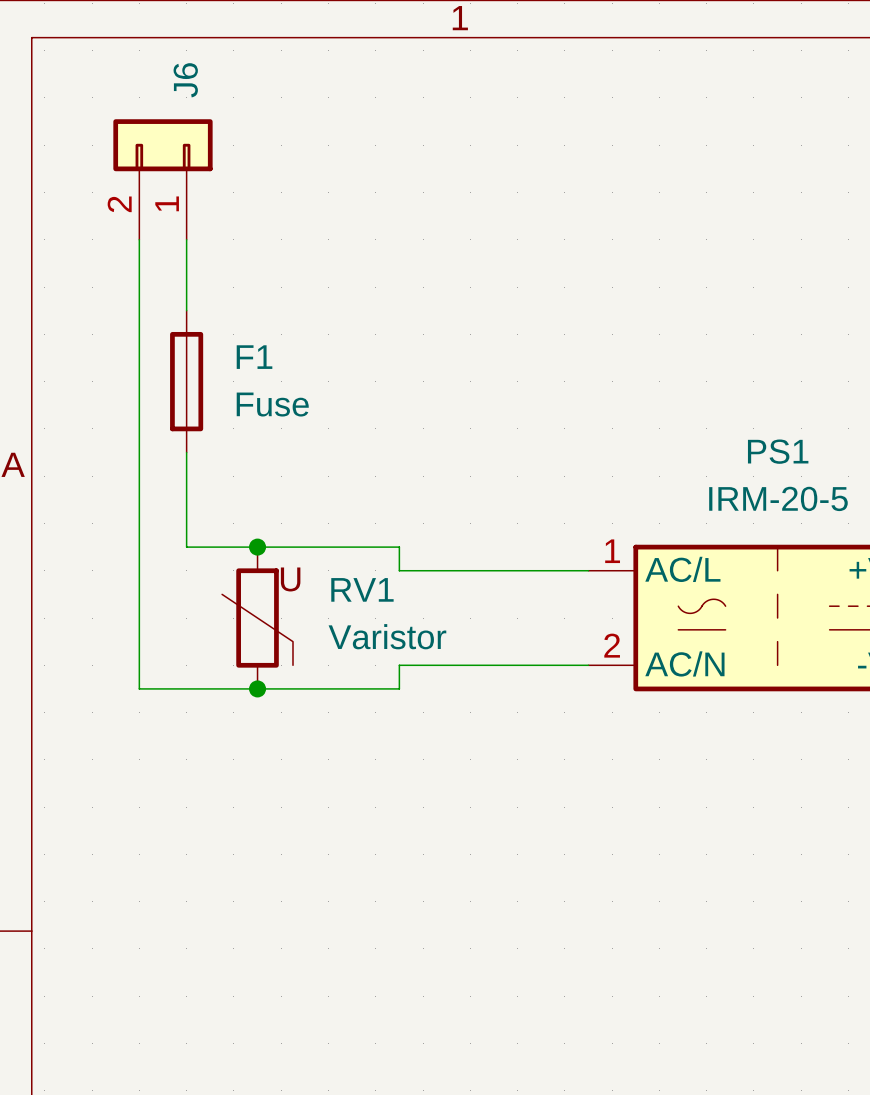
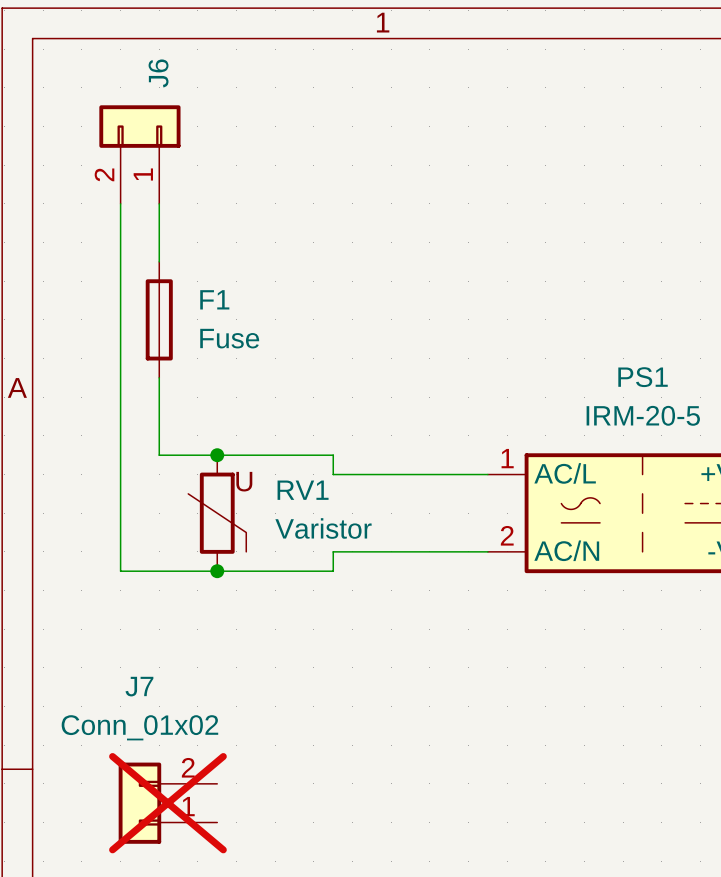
J7: none -> Conn_01x02 (167, 803)

